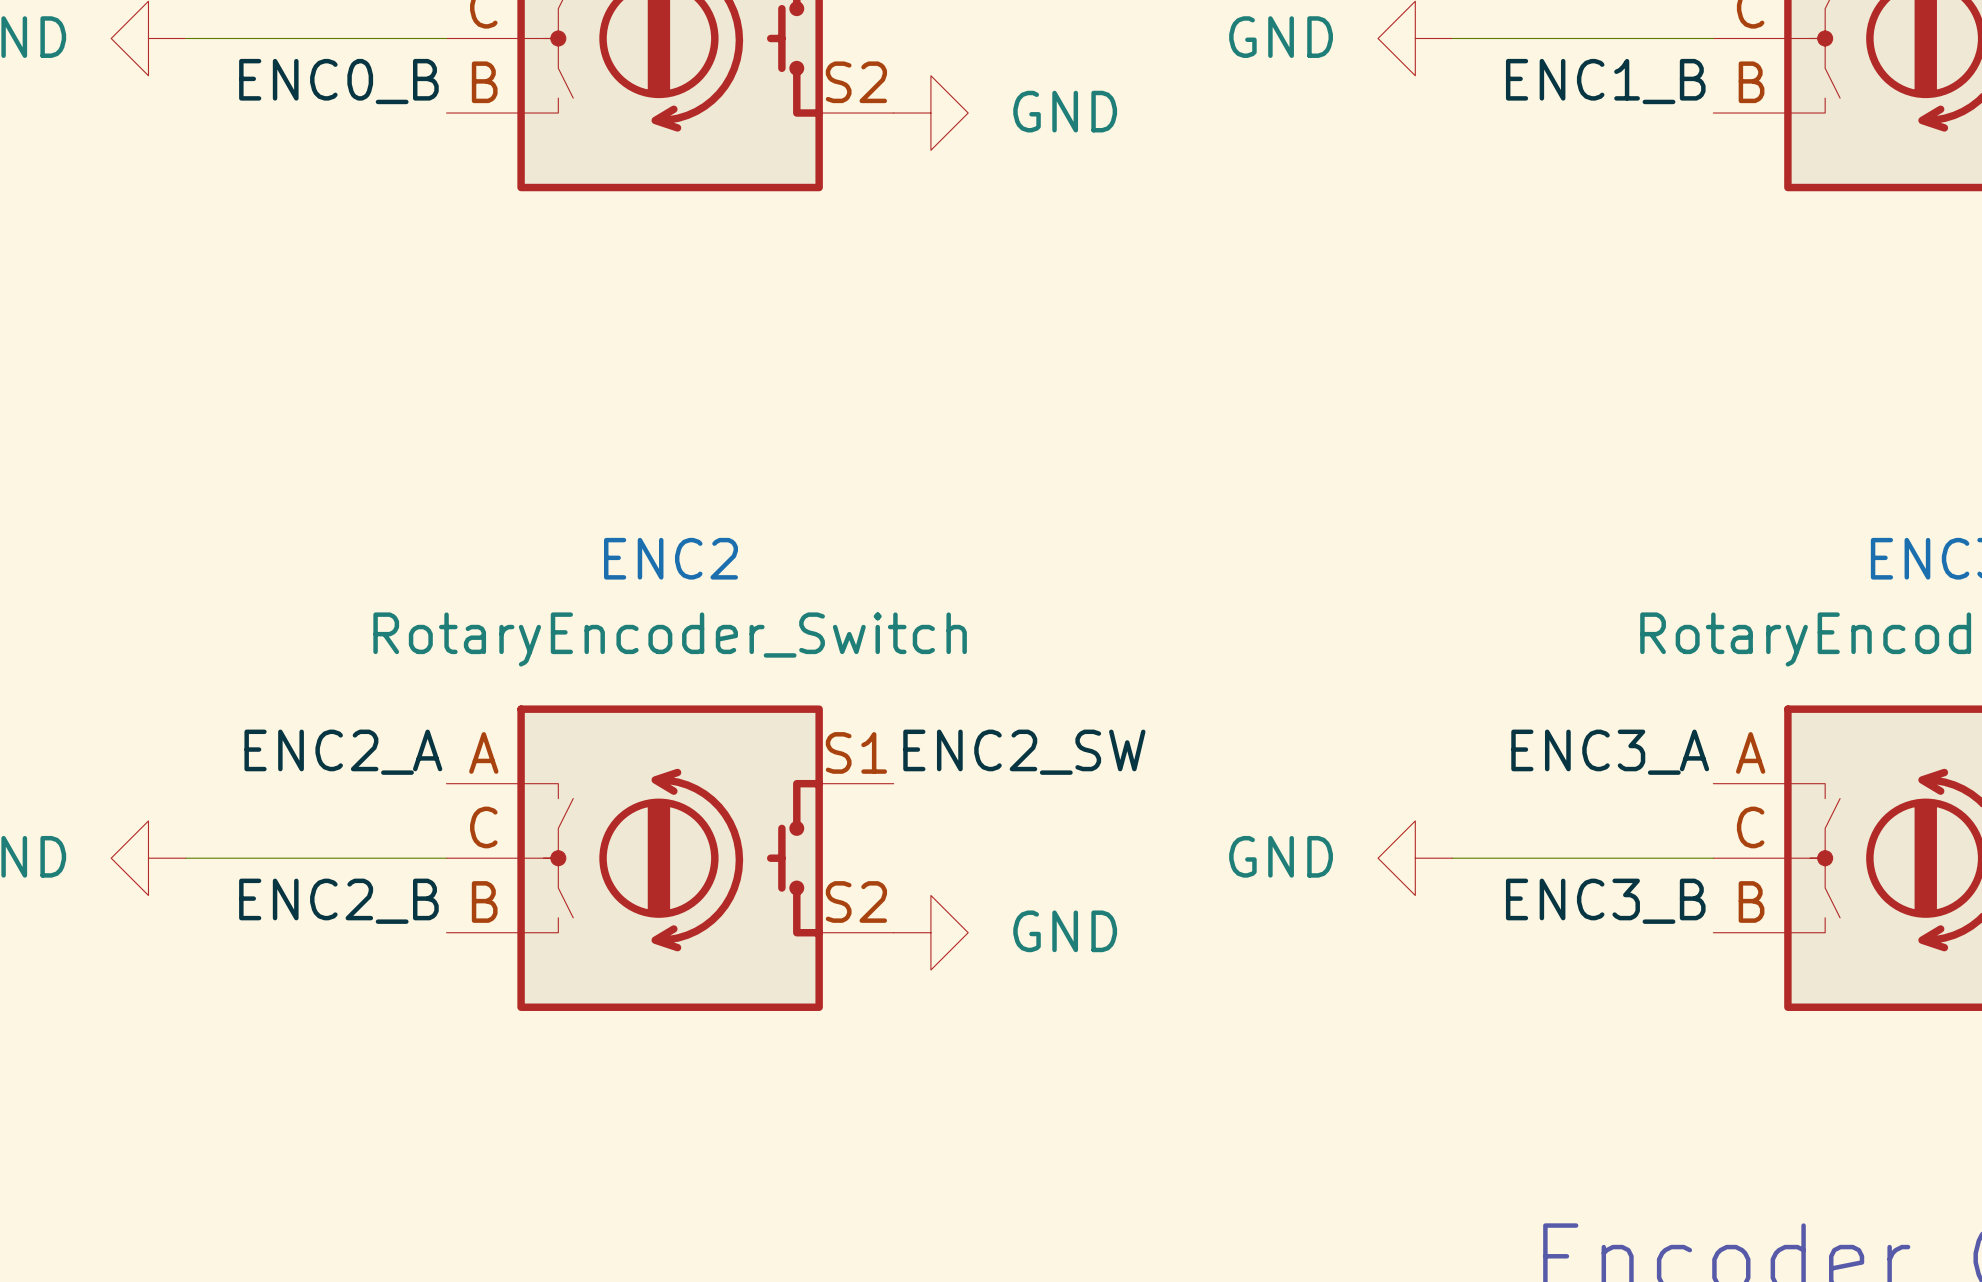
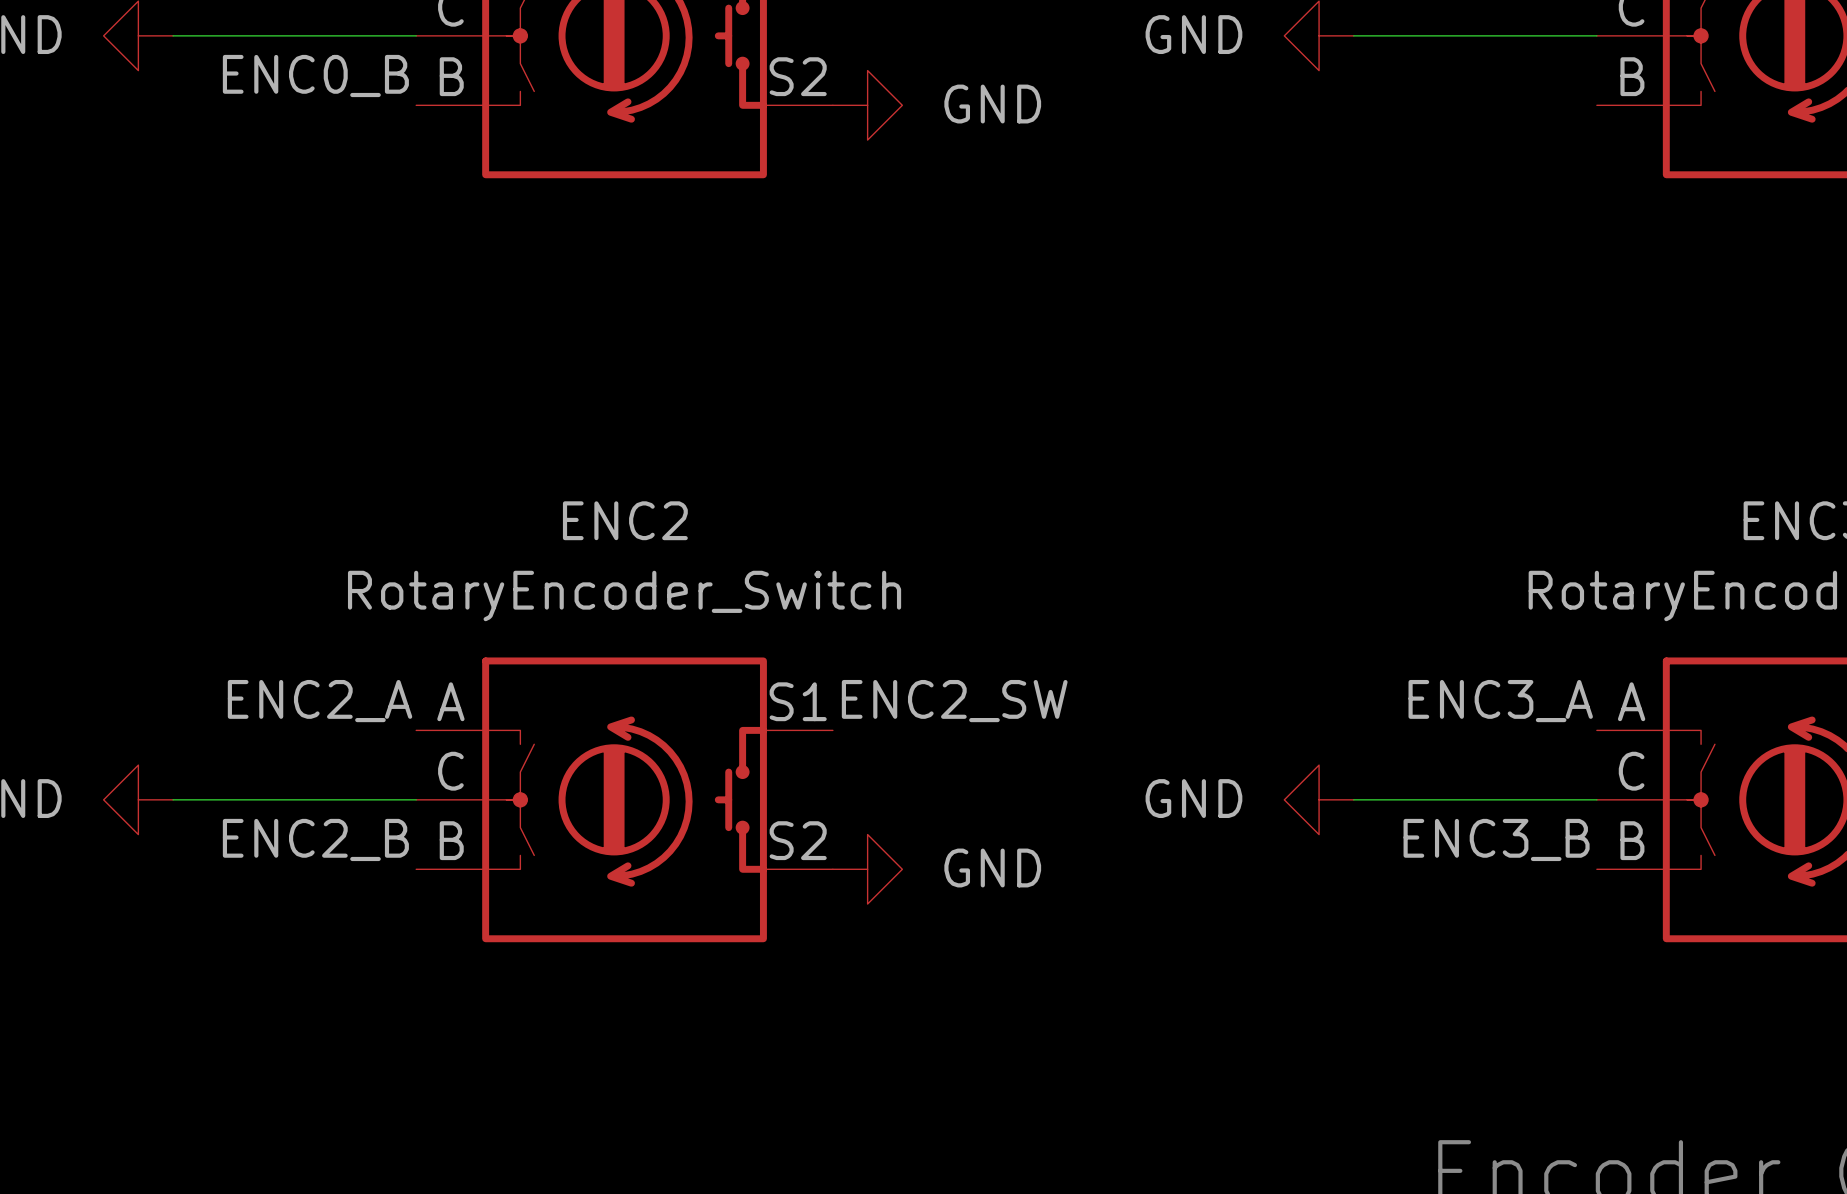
label: ENC1_B (1605, 81) -> none

